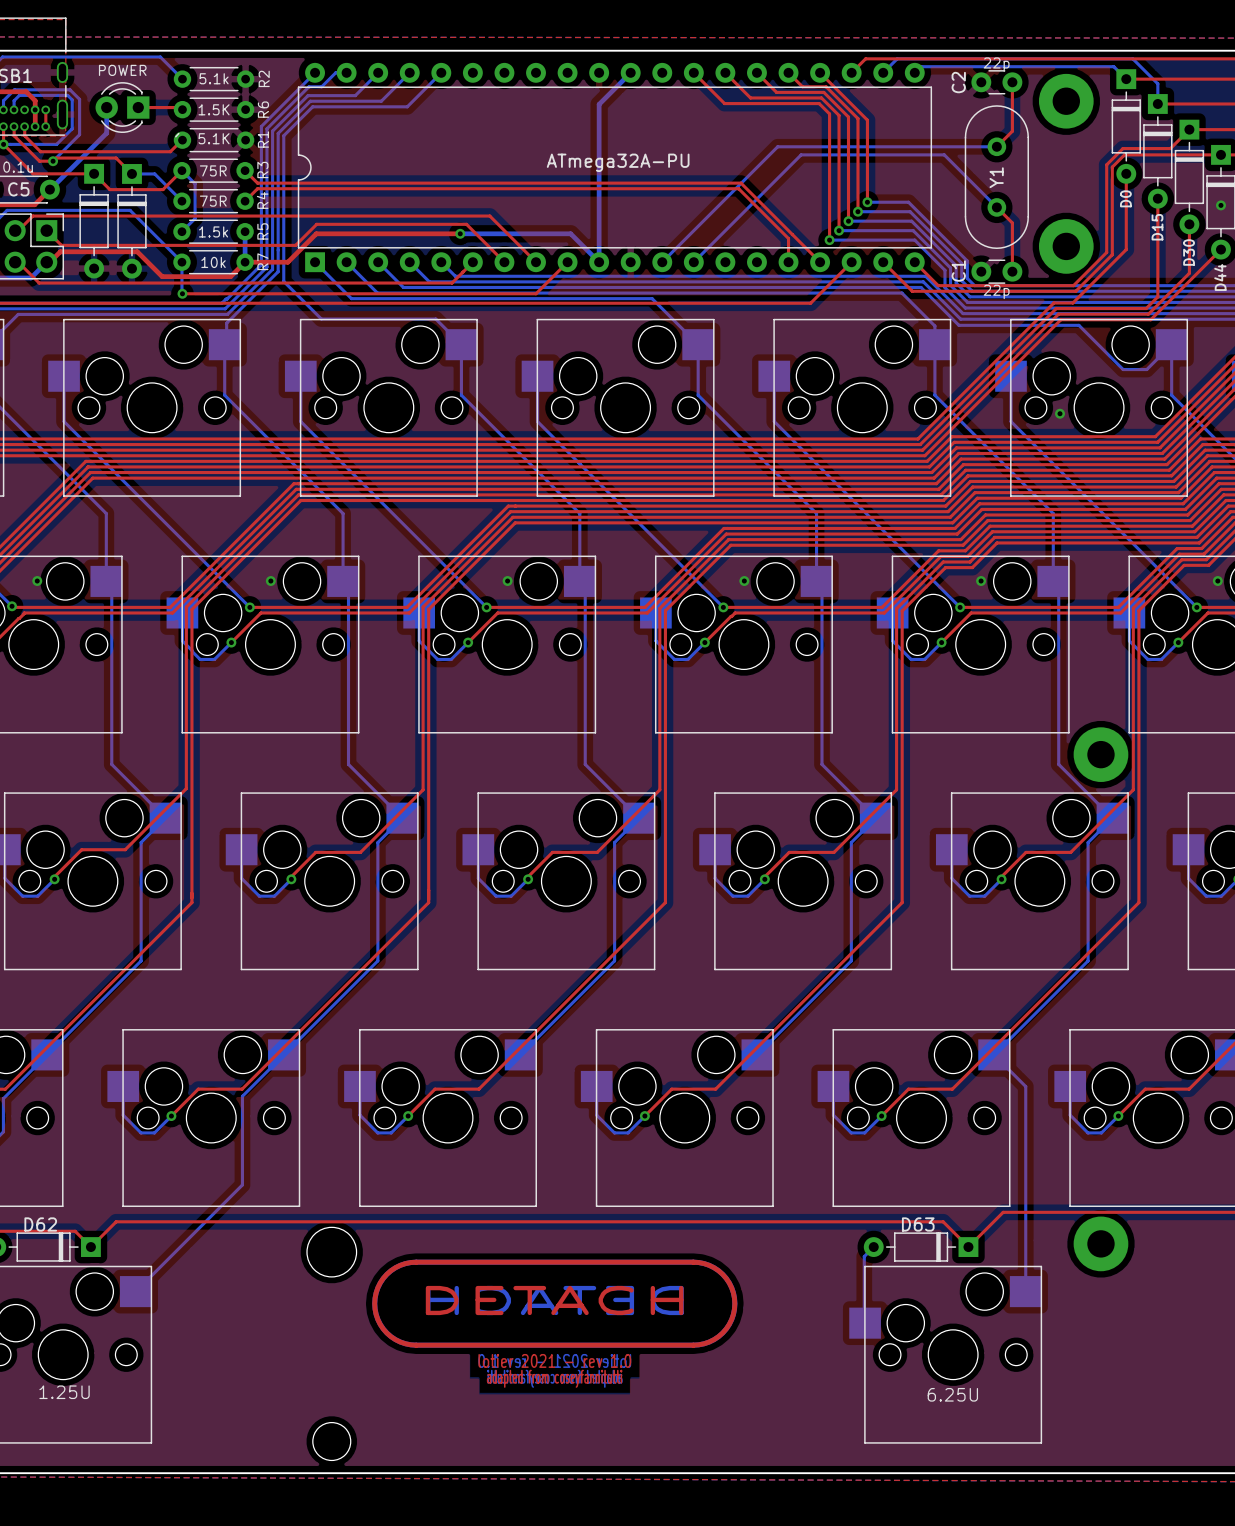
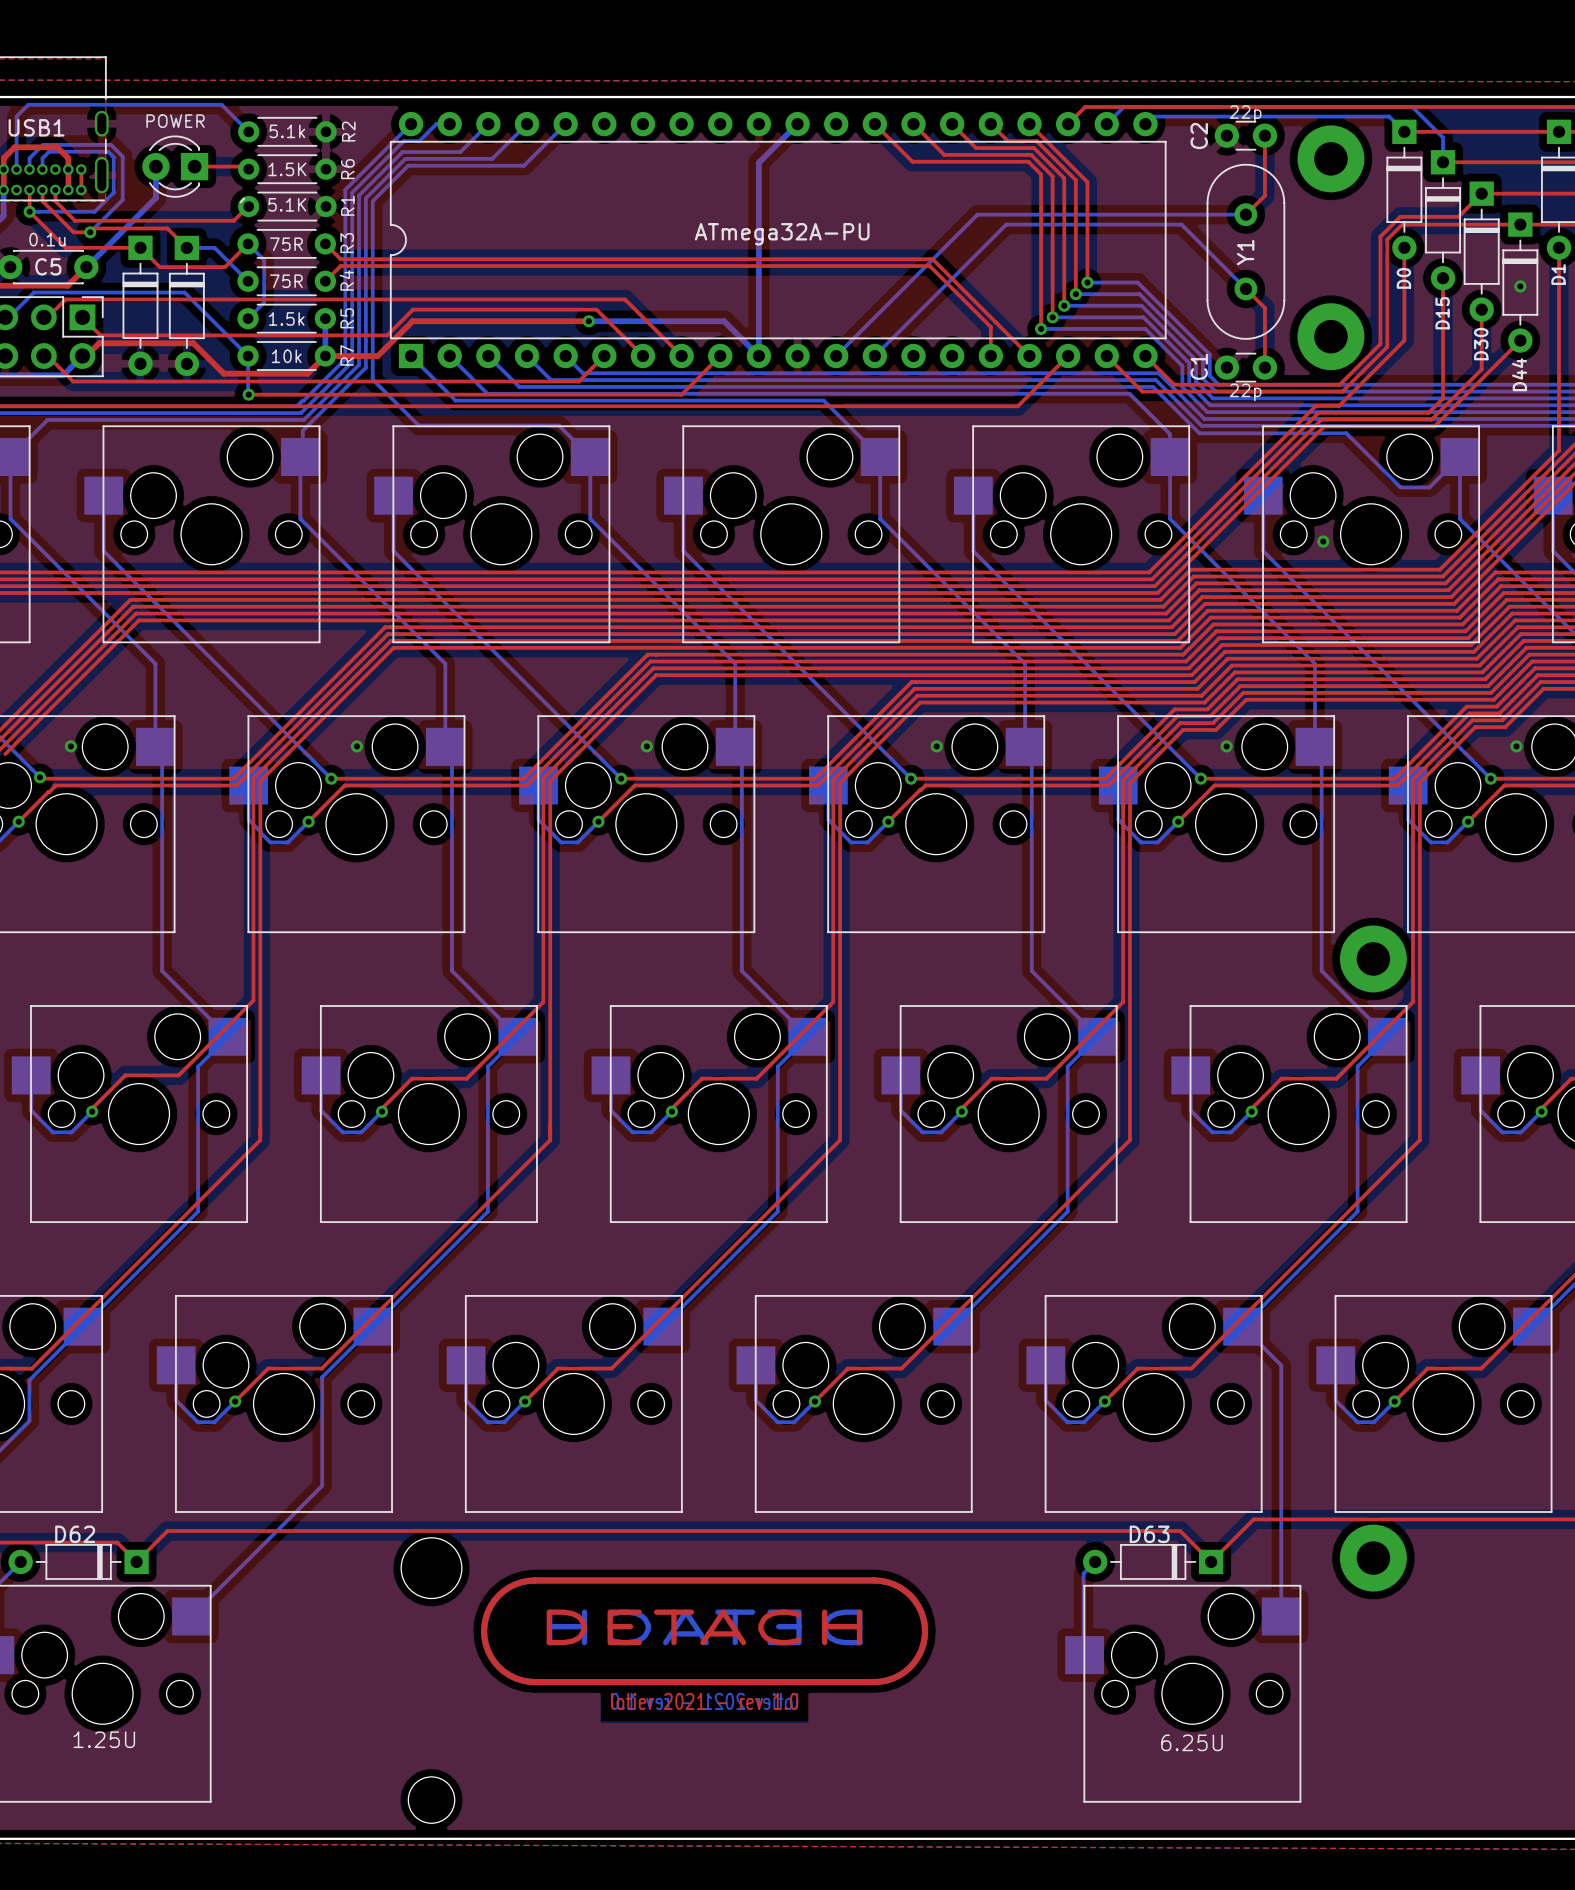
drawing: [372, 1259, 738, 1348] -> none
drawing: none -> [481, 1577, 929, 1686]

